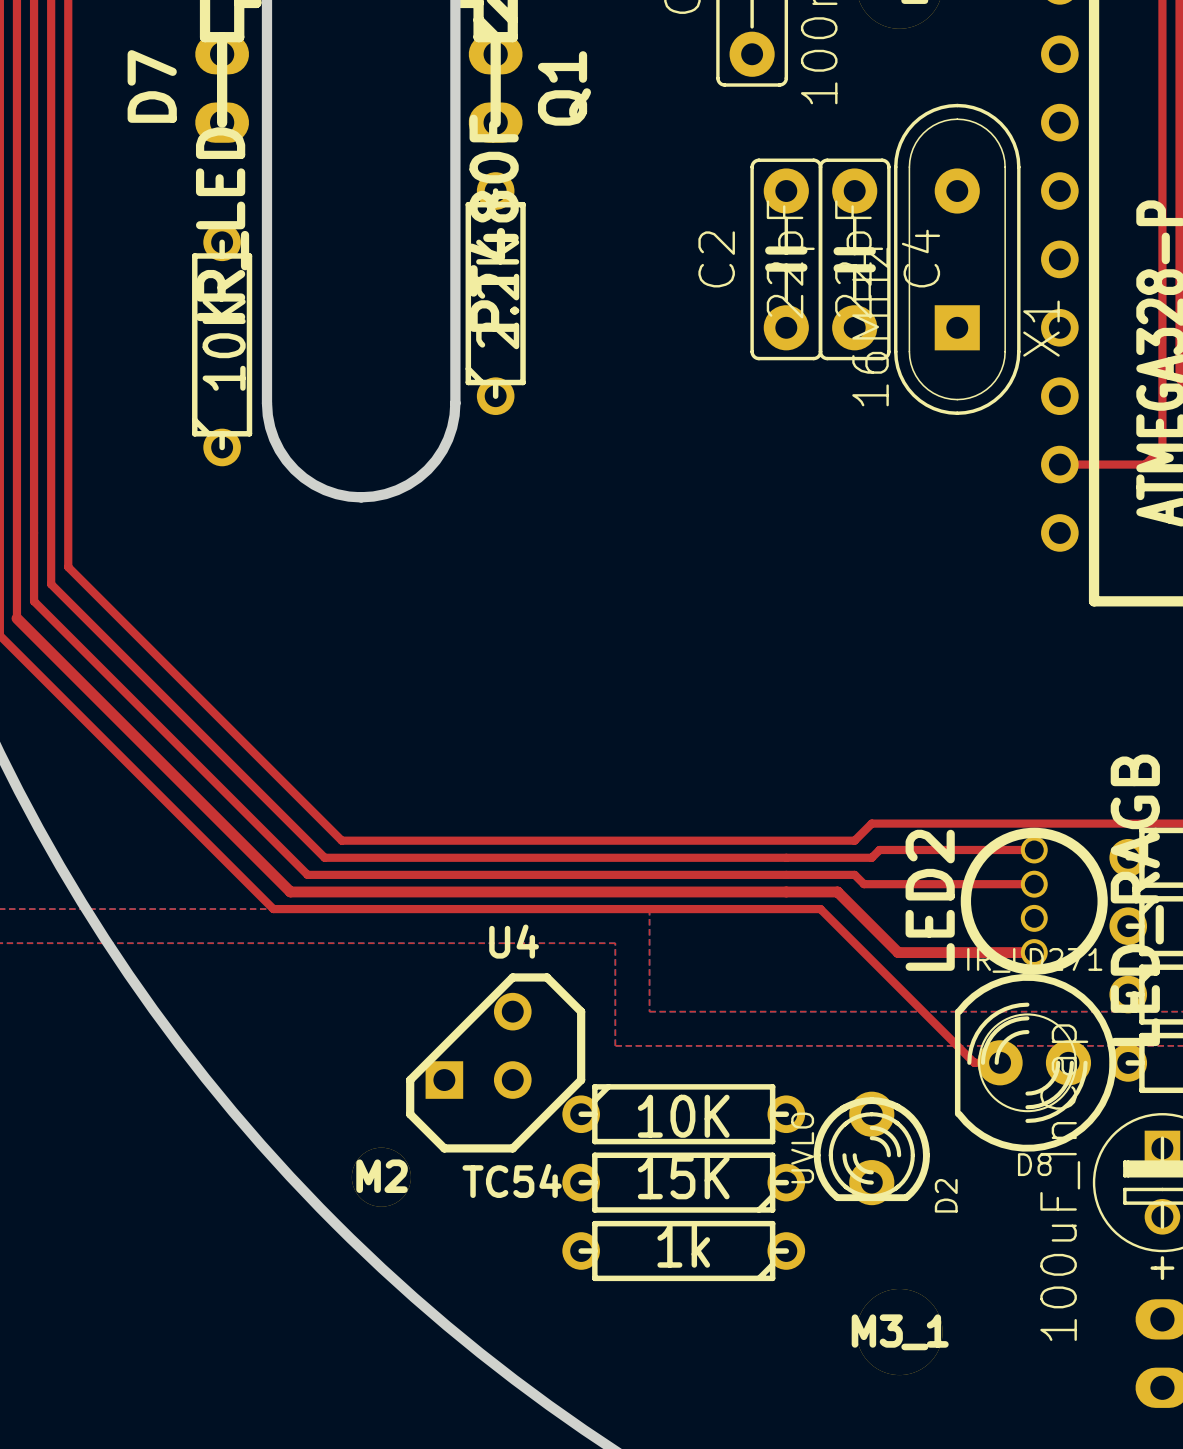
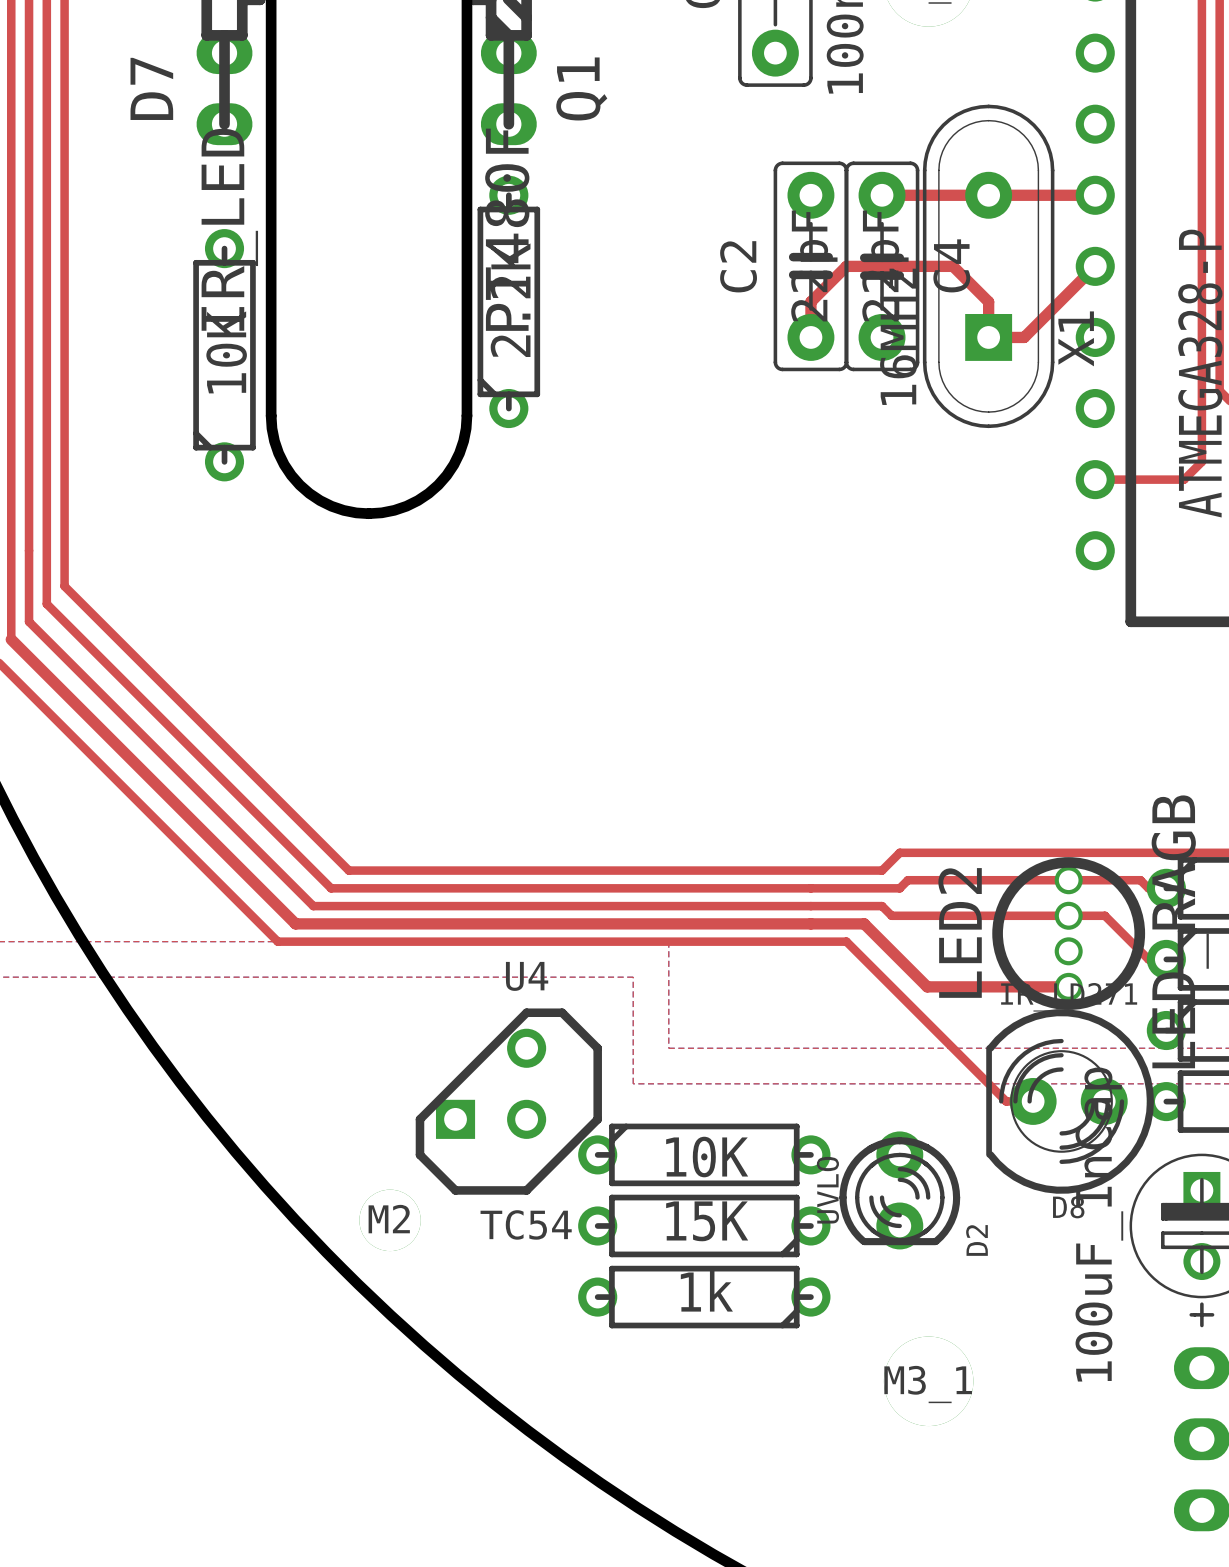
top track: none -> (882, 195) (1095, 195)
top track: none -> (1095, 266) (1024, 337) (988, 337) (988, 301) (953, 266) (846, 266) (810, 301) (810, 337)
top track: none -> (1068, 880) (1140, 880) (1148, 888) (1166, 888)
top track: none -> (1068, 915) (1104, 915) (1148, 959) (1166, 959)

